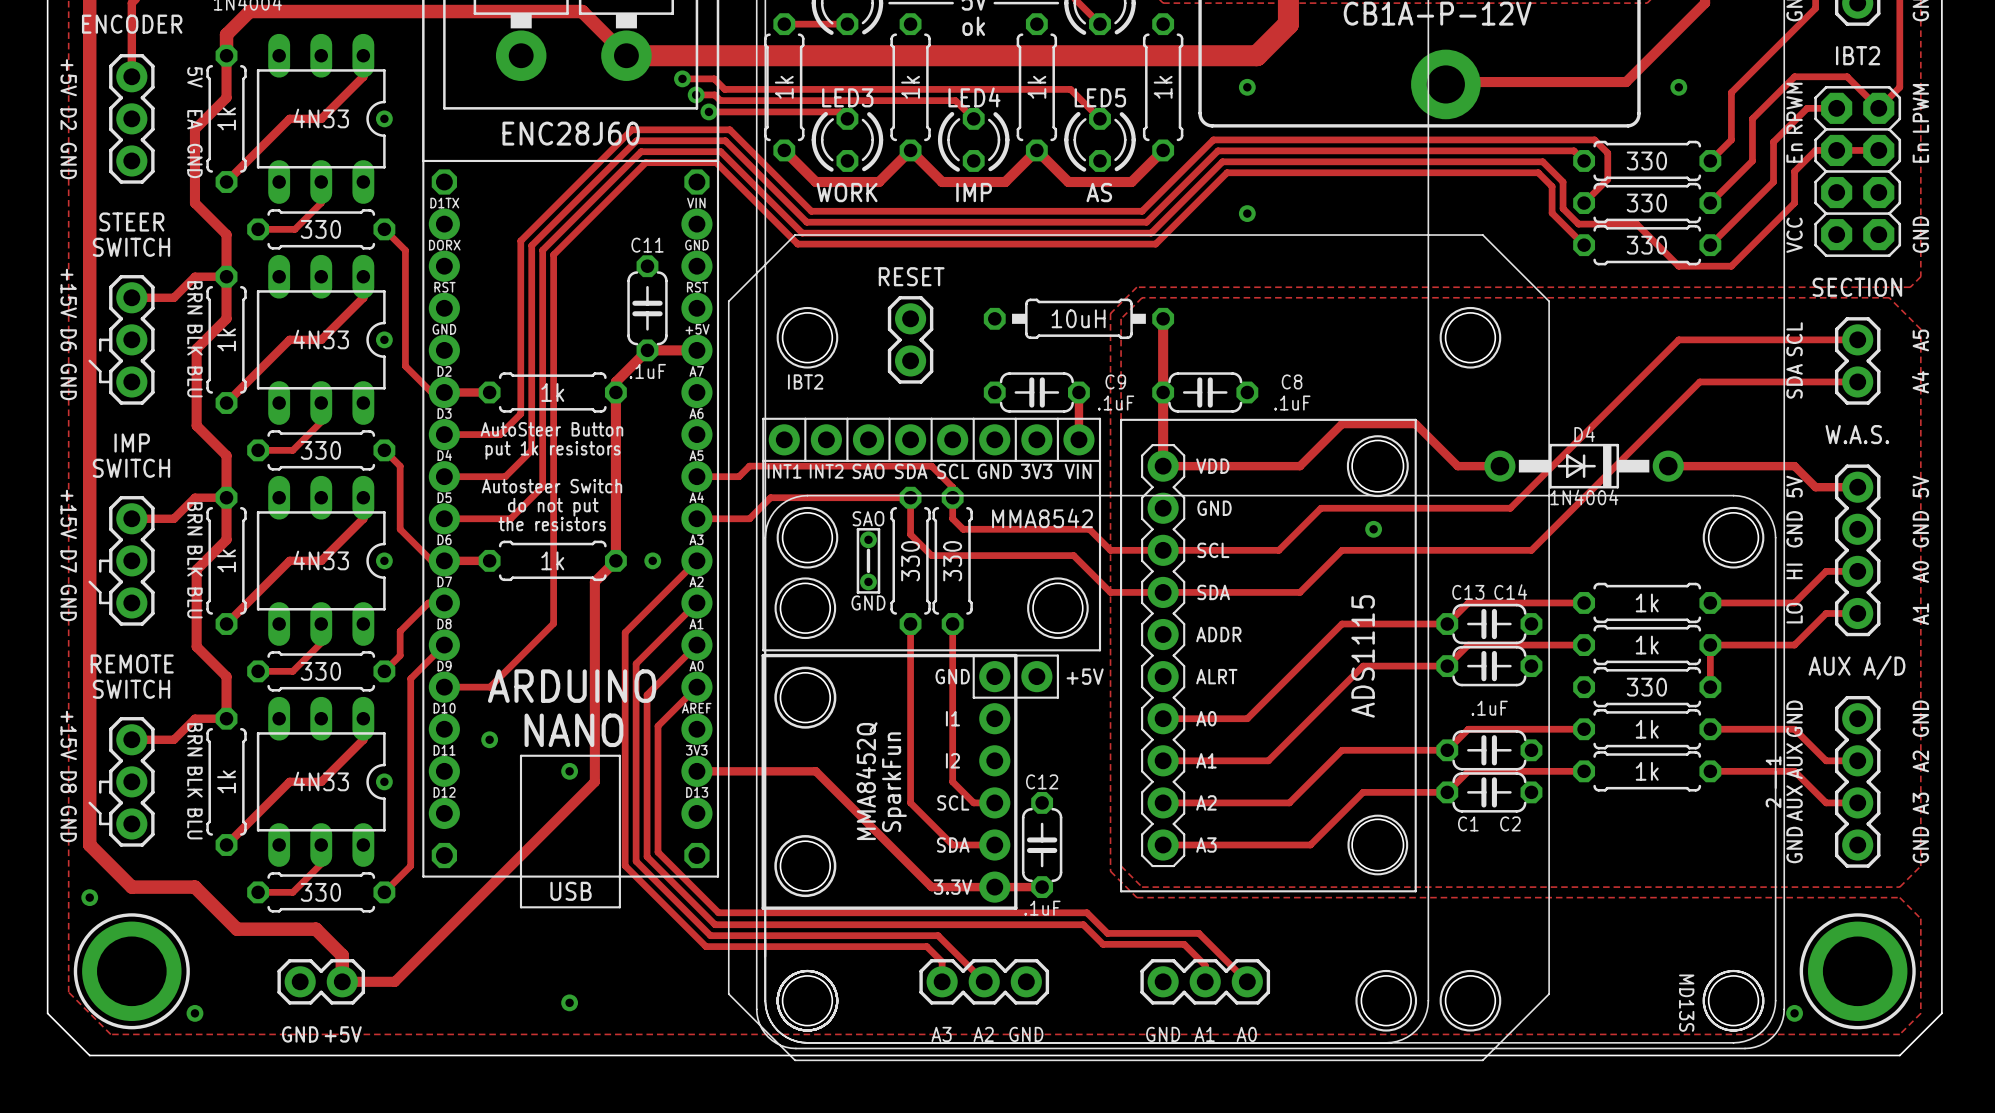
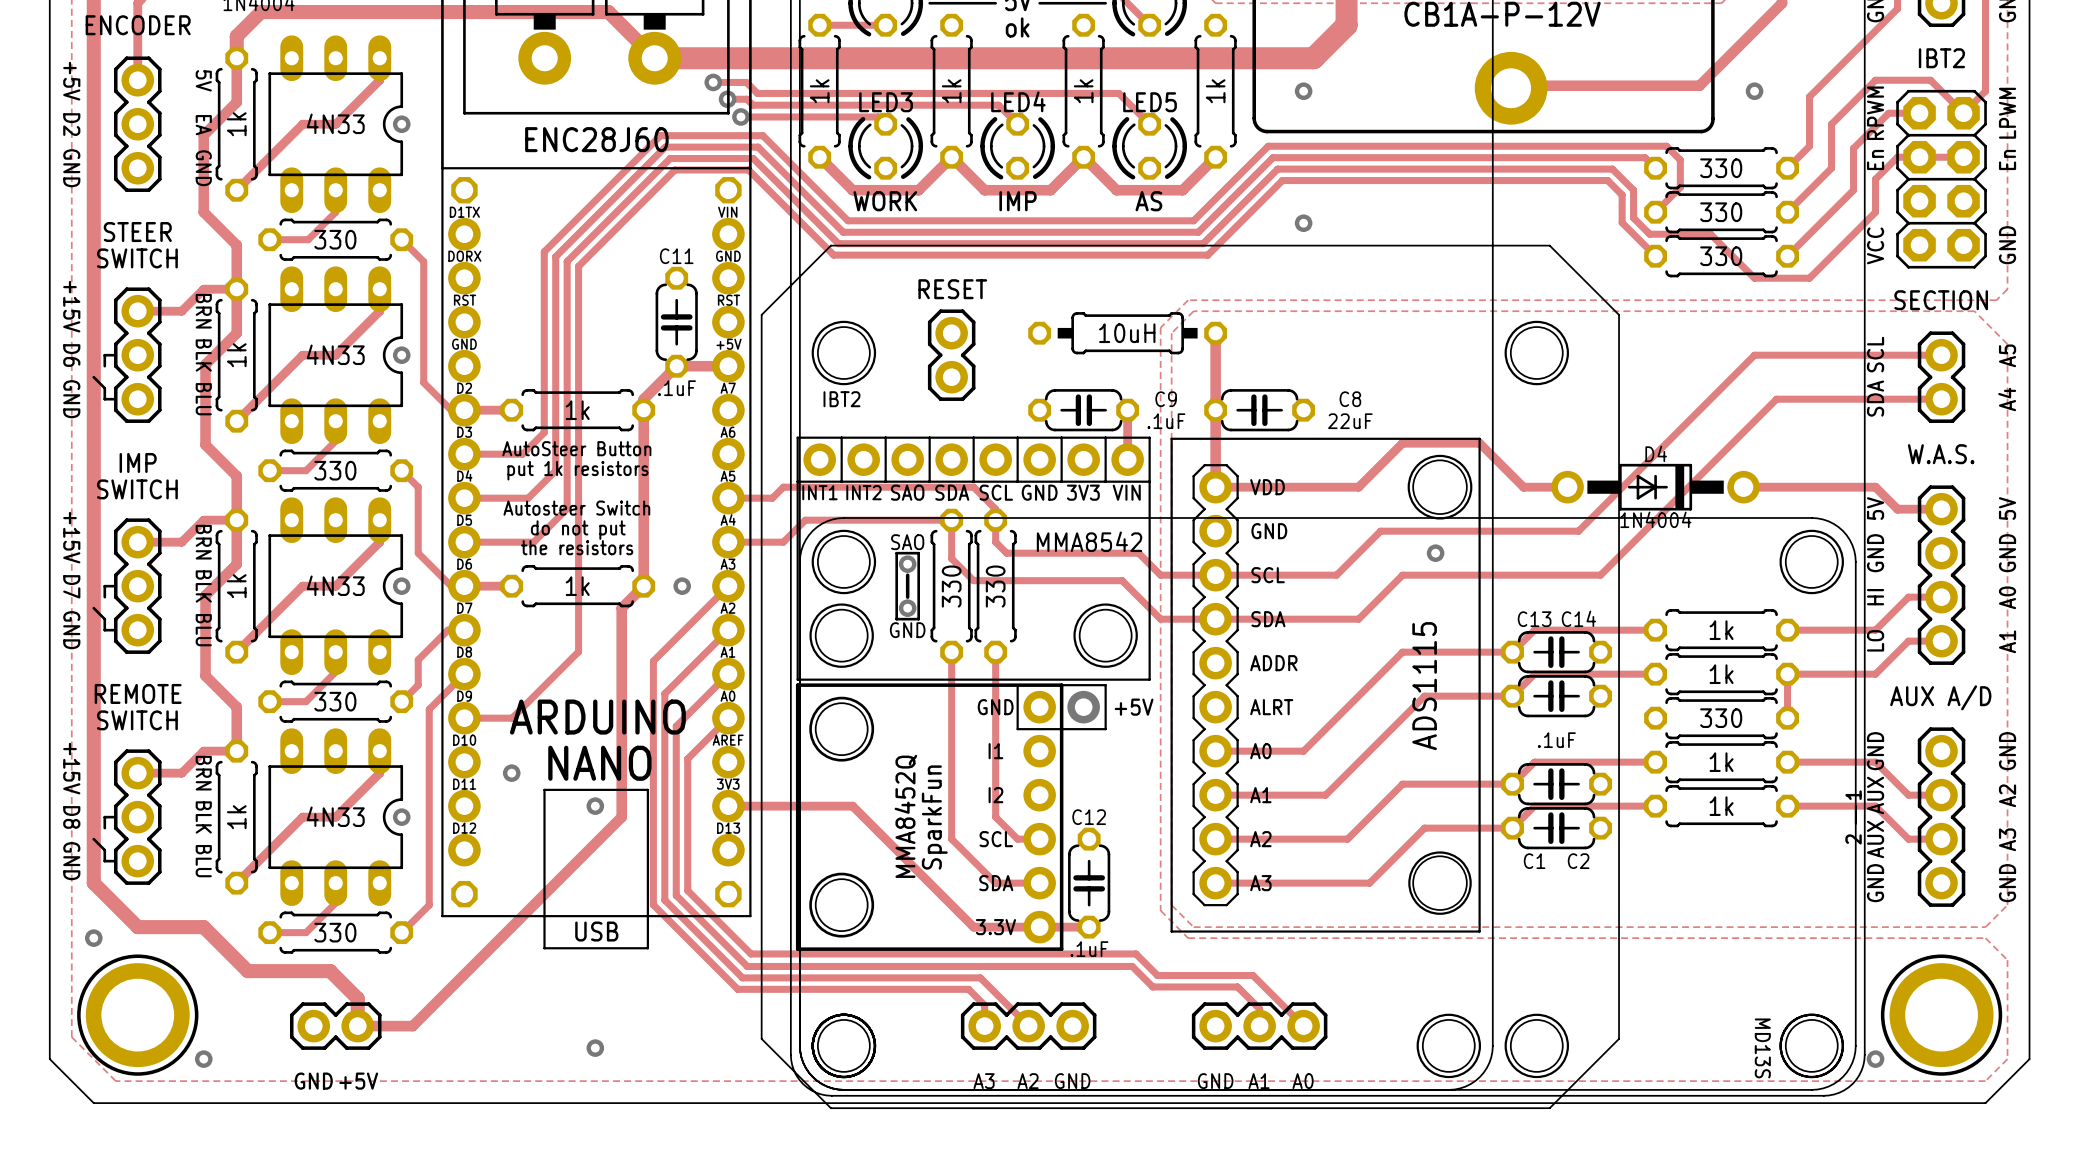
C8 value: .1uF (1292, 403) -> 22uF (1350, 421)

